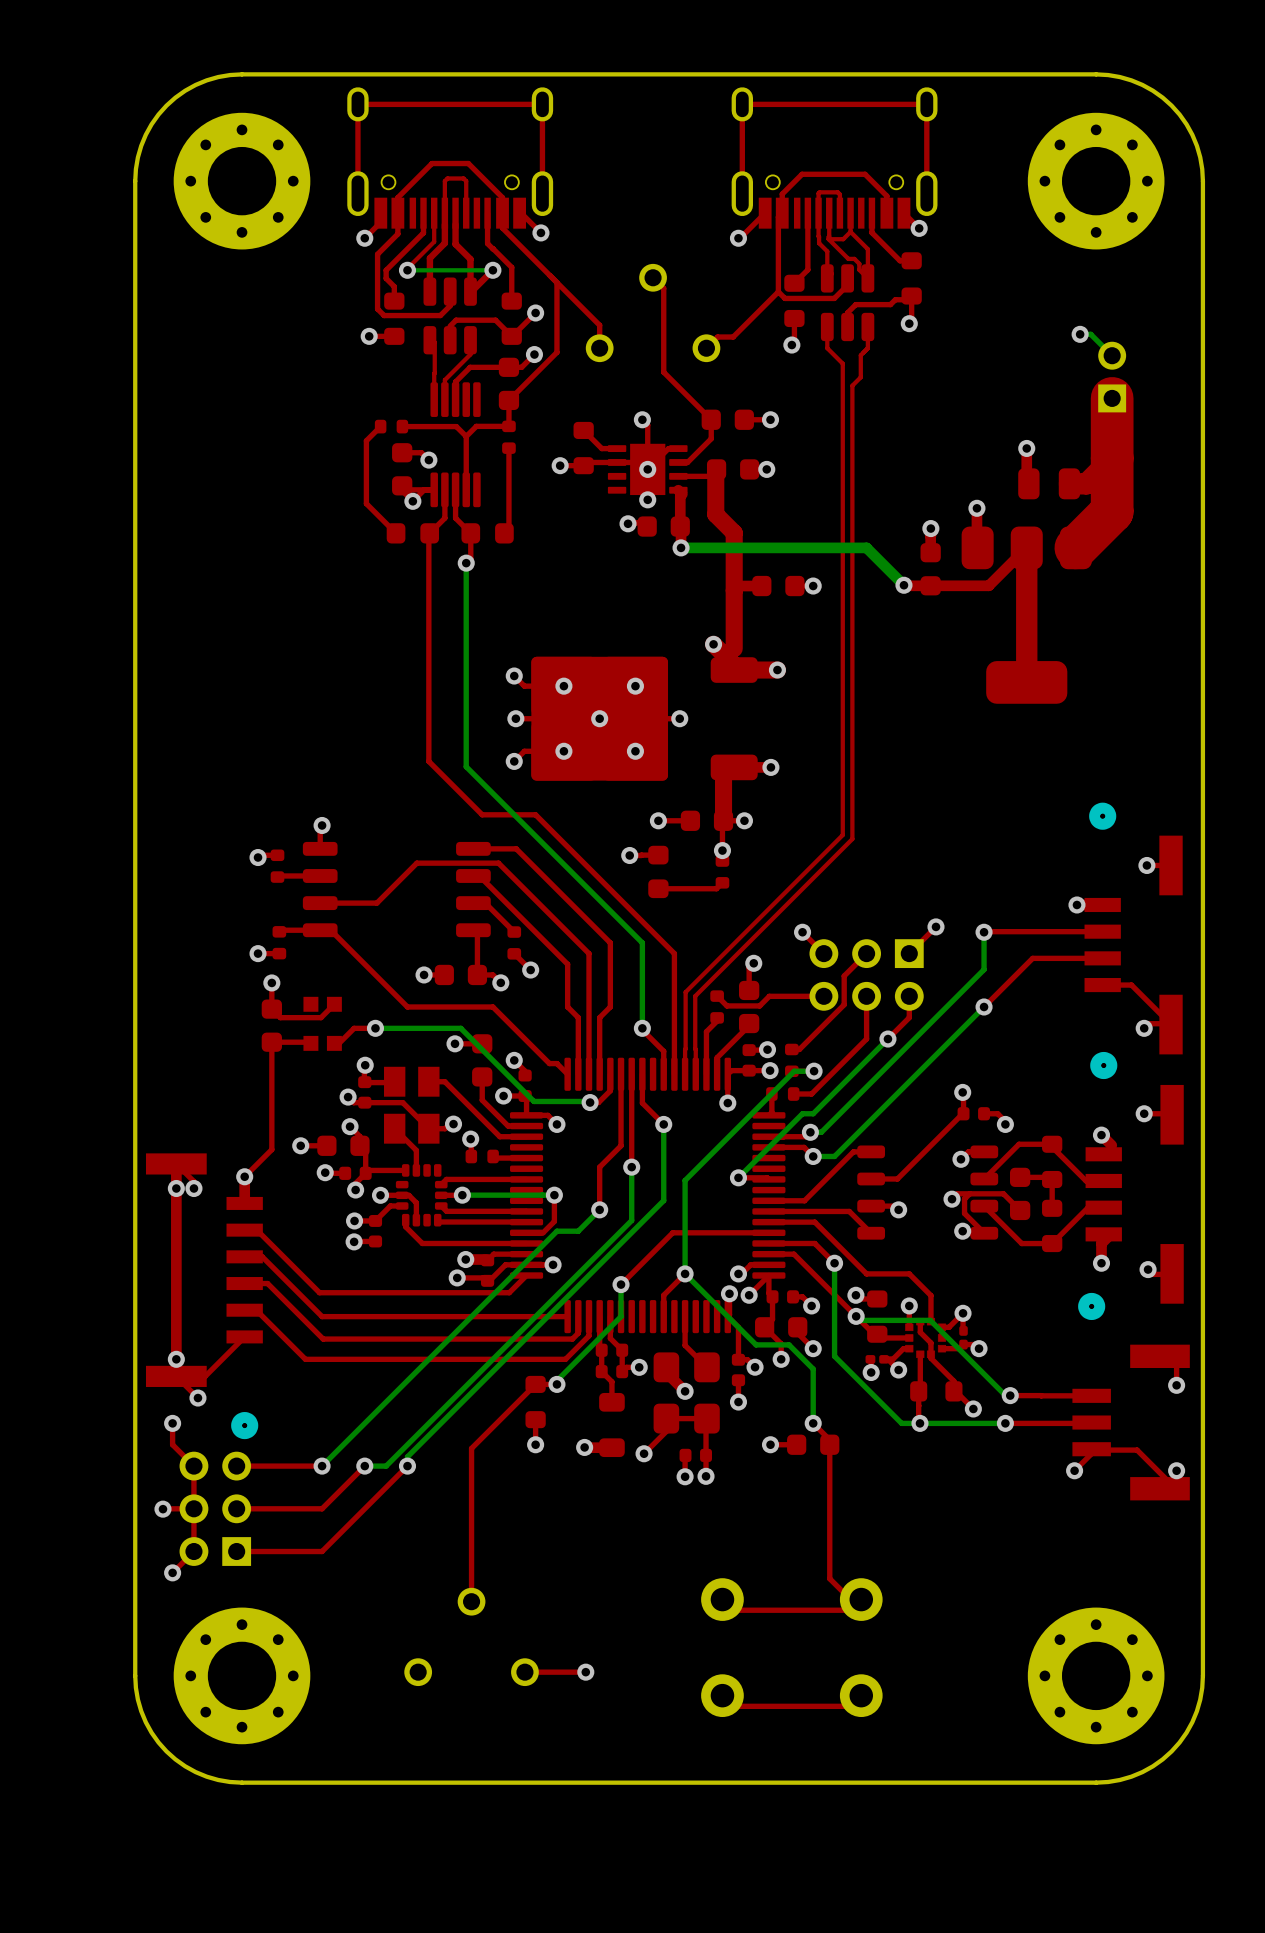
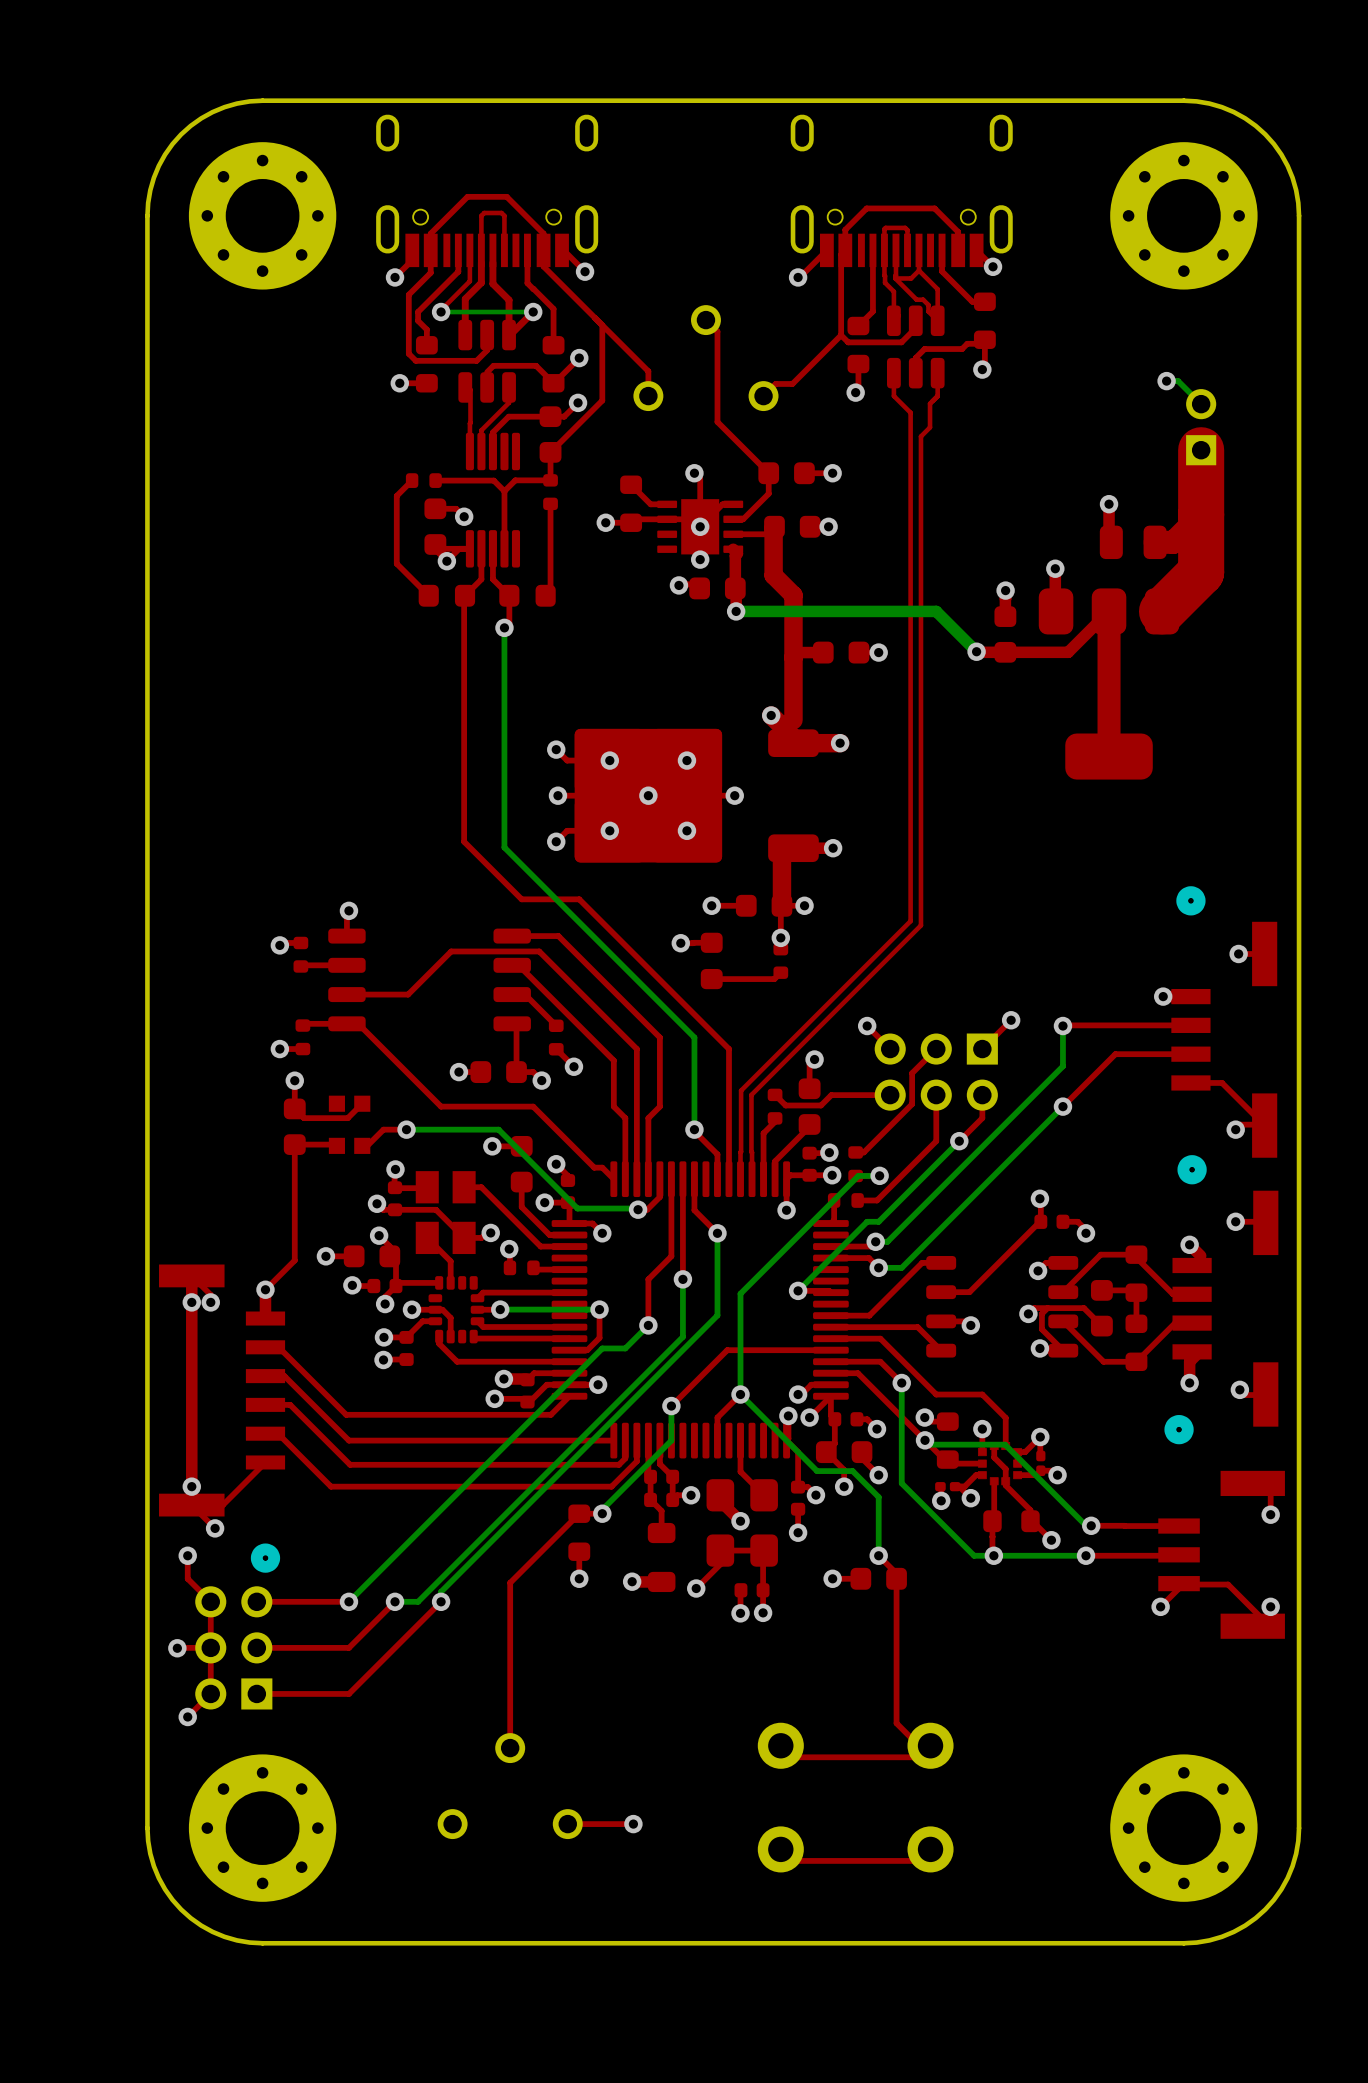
top track: (542, 193) (542, 104) (357, 104) (357, 193) -> none
top track: (926, 193) (926, 104) (742, 104) (742, 193) -> none

